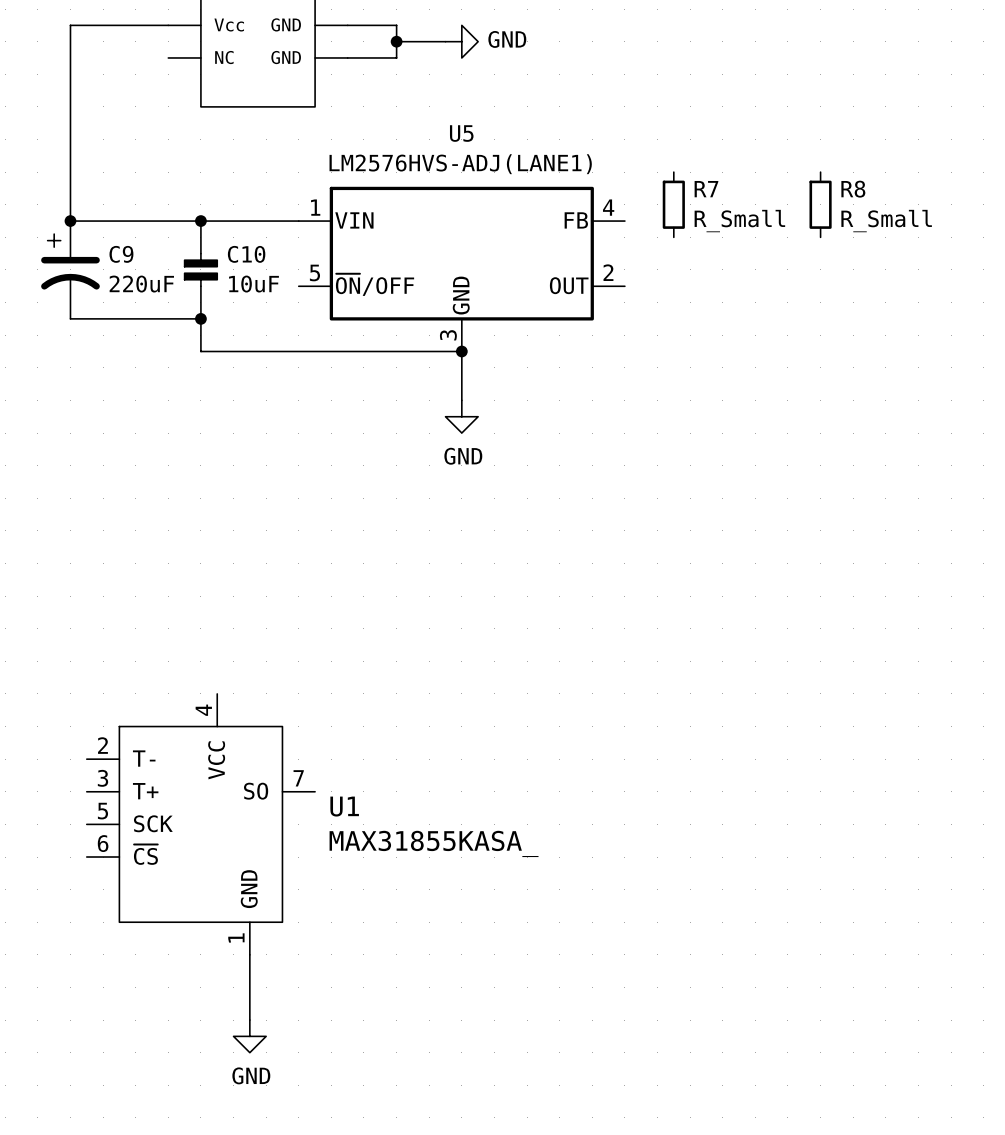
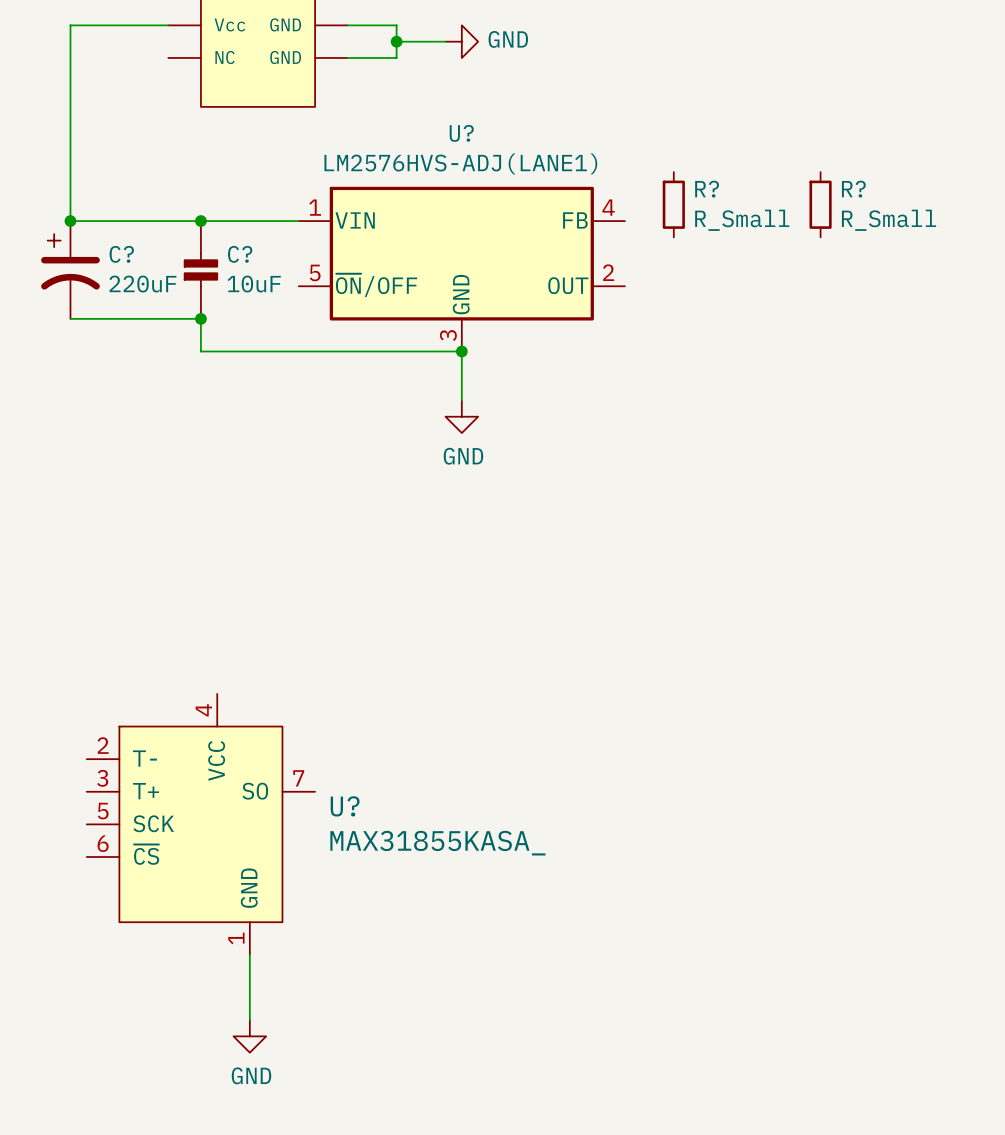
U5 name: U5 (461, 133) -> U? (461, 133)
R7 name: R7 (706, 189) -> R? (707, 189)
R8 name: R8 (853, 189) -> R? (853, 189)
C9 name: C9 (121, 254) -> C? (121, 254)
C10 name: C10 (246, 254) -> C? (240, 254)
U1 name: U1 (344, 806) -> U? (345, 806)

